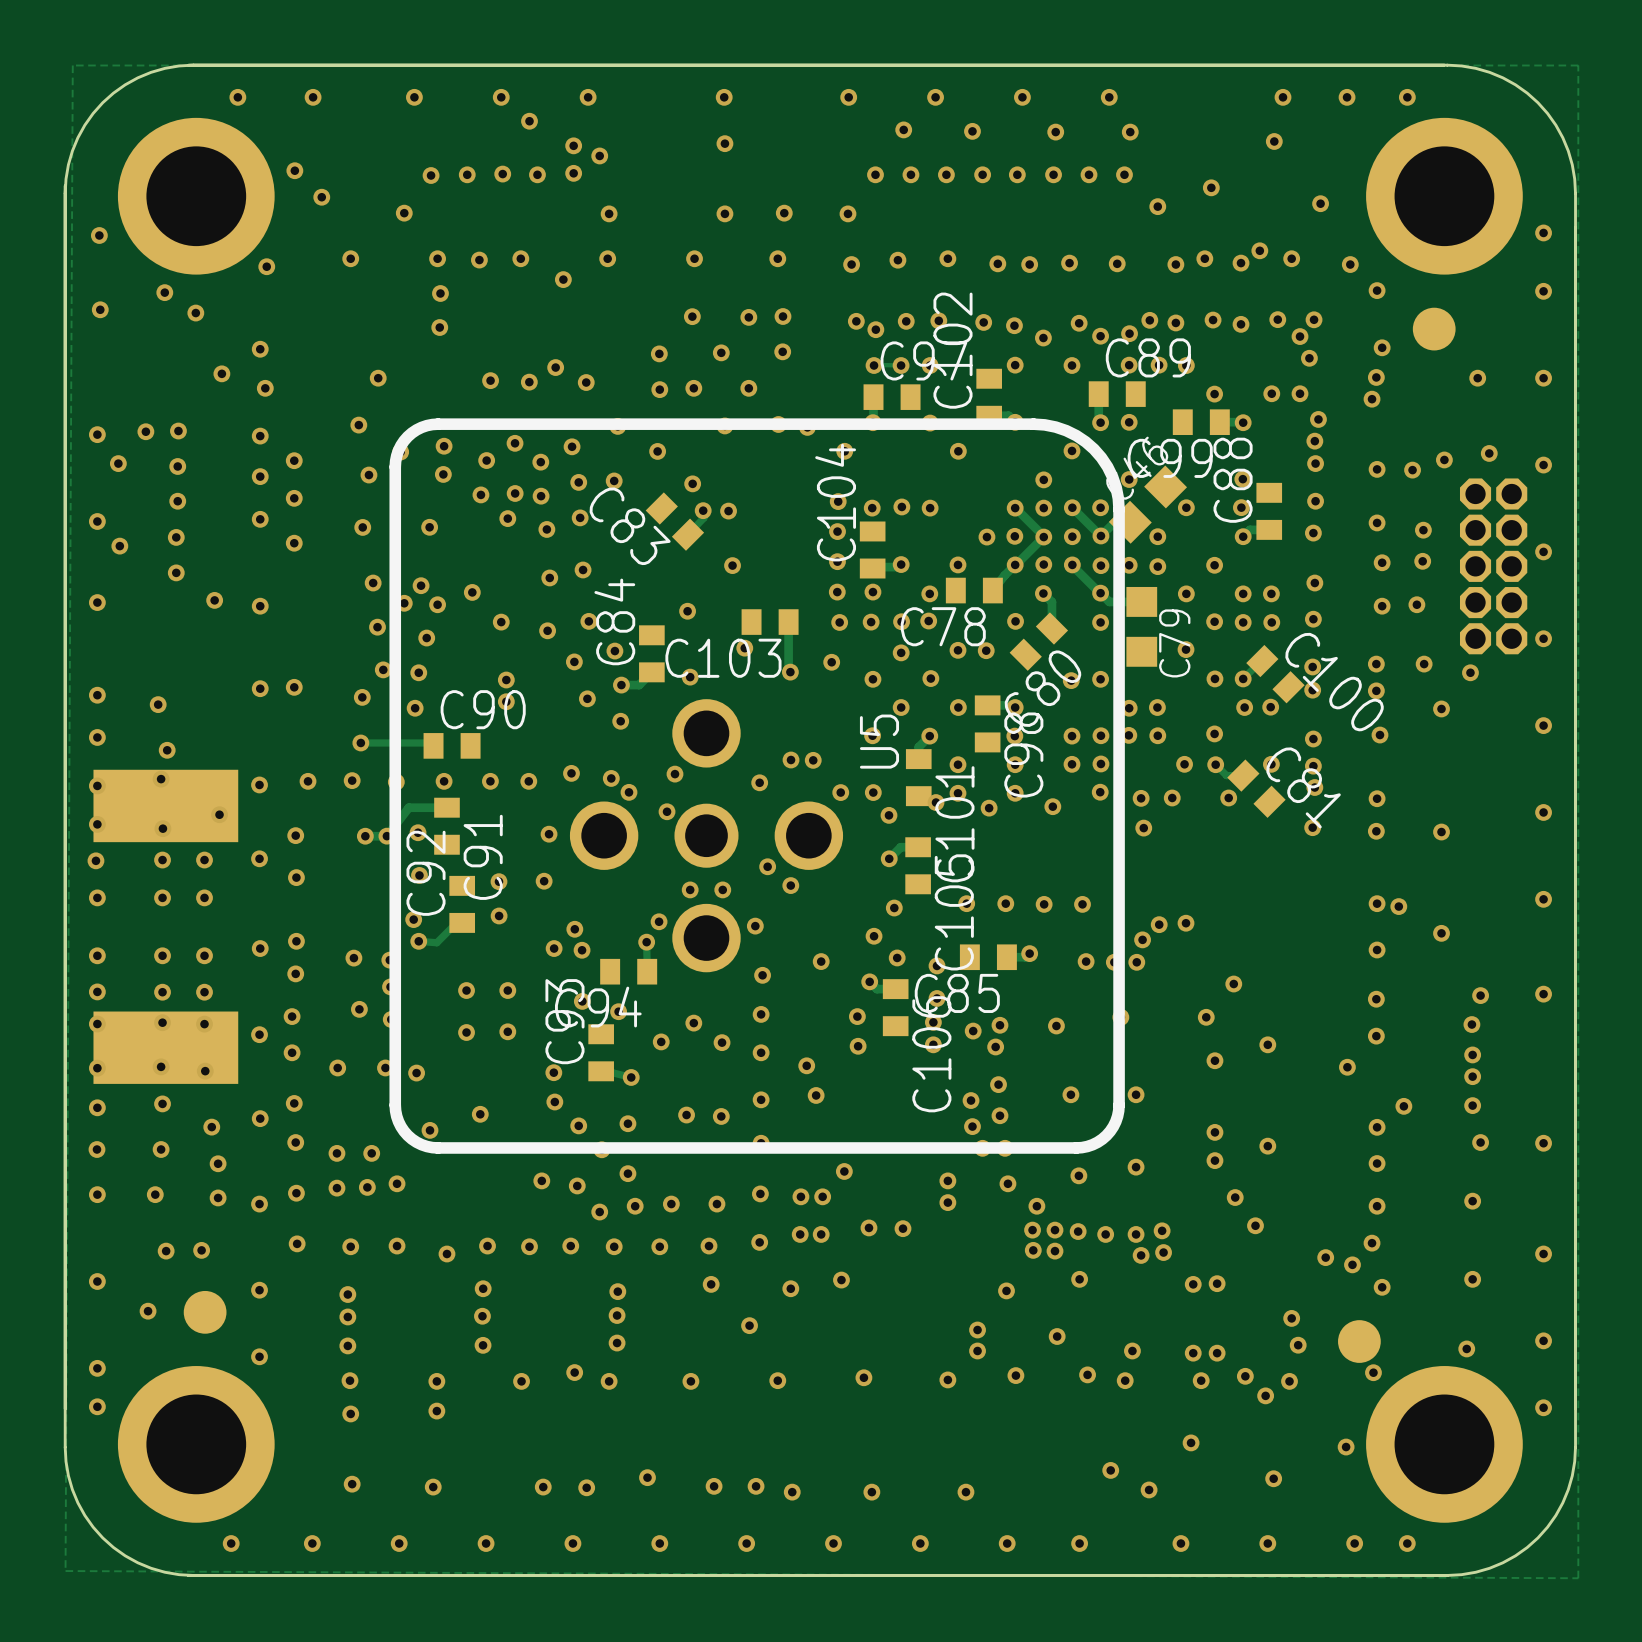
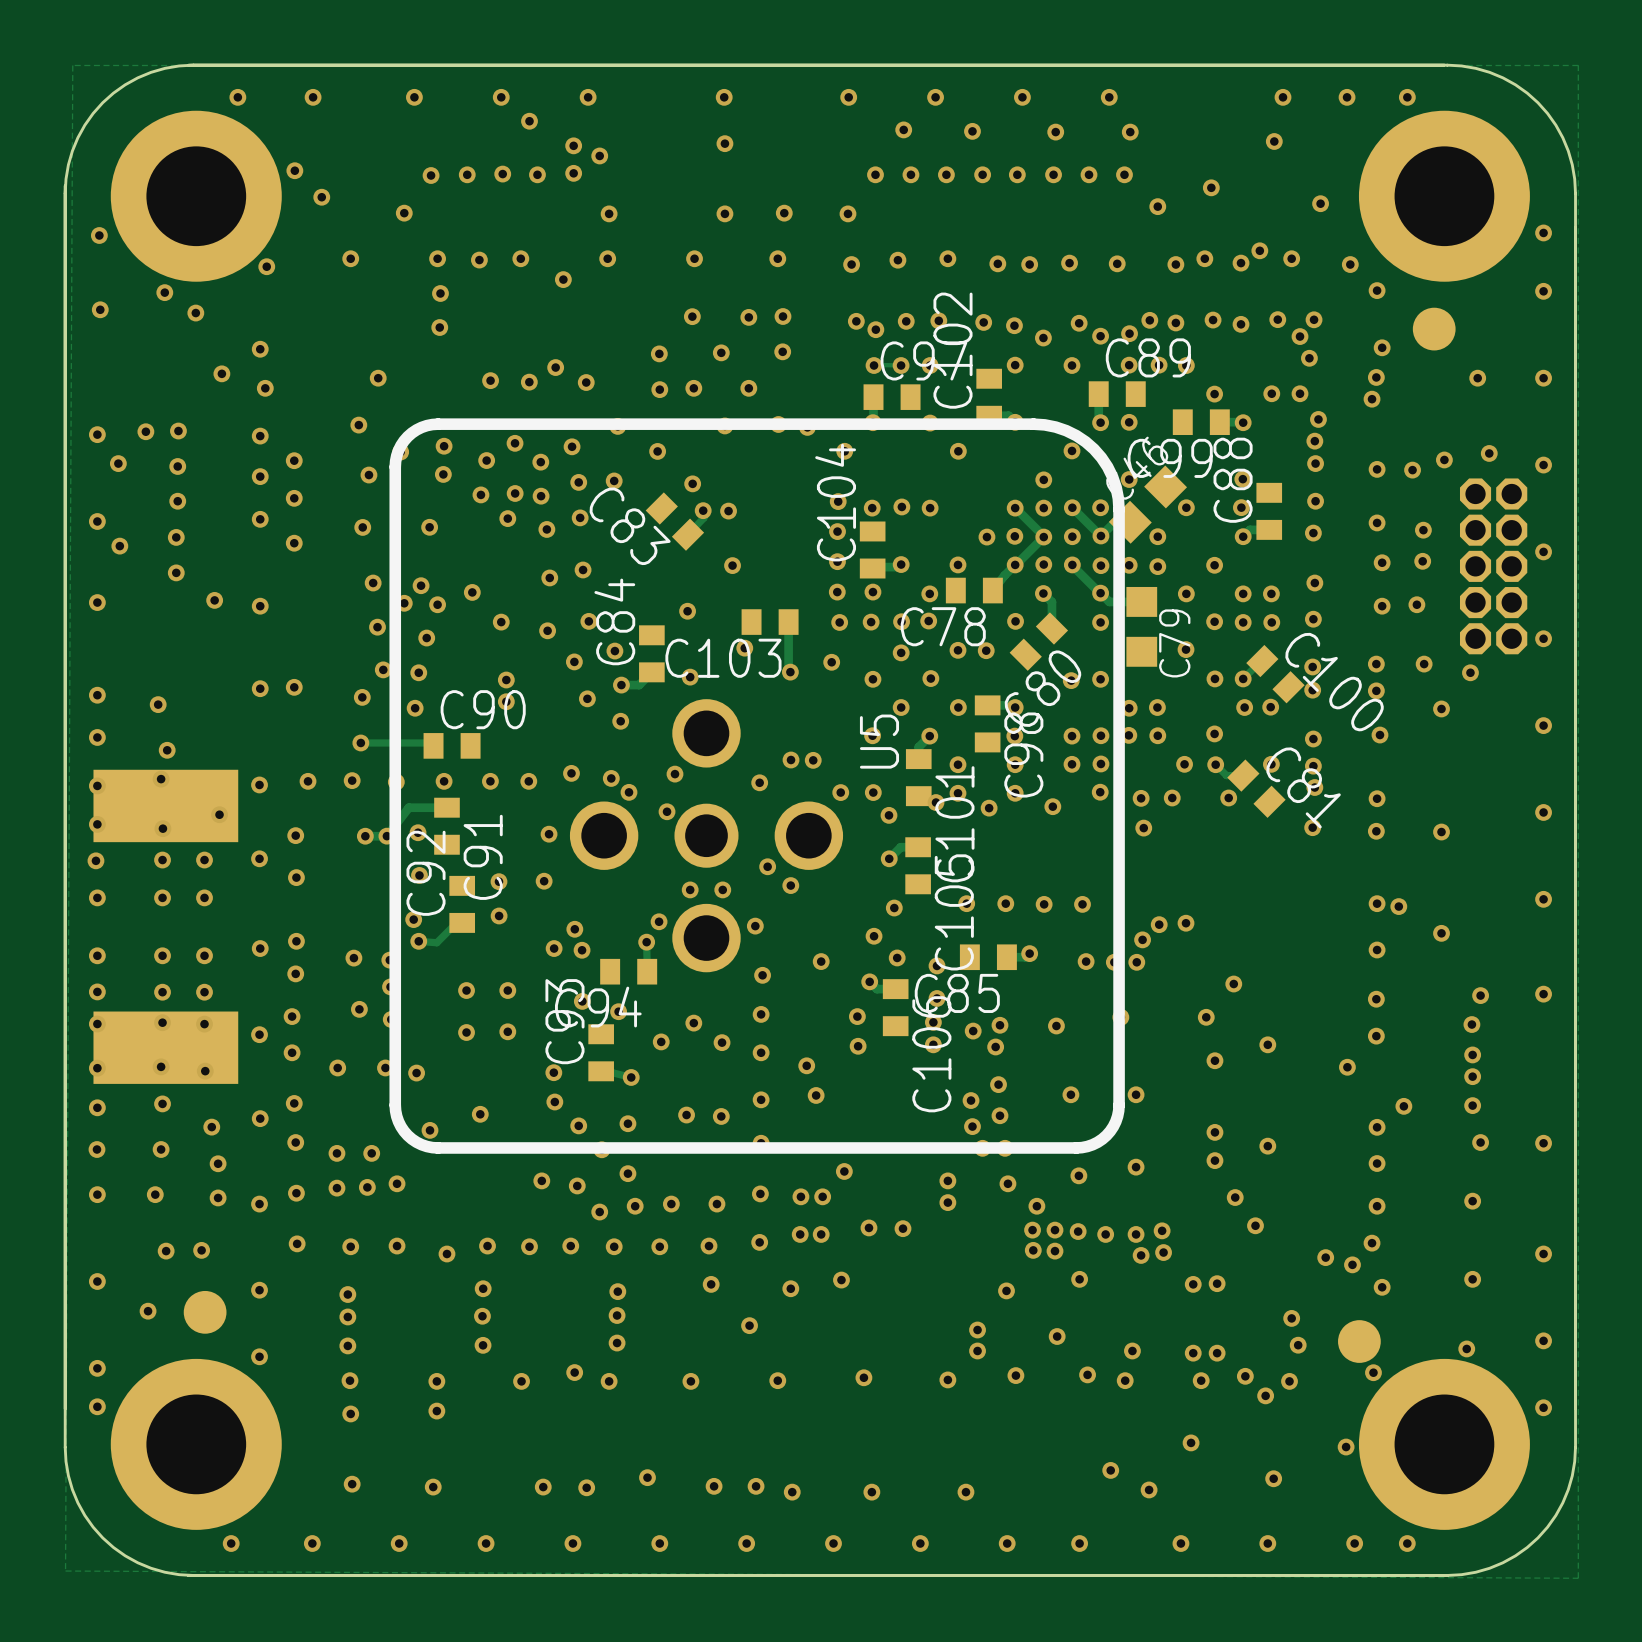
part footprint: [117, 117, 275, 275] -> [110, 110, 282, 282]
part footprint: [1366, 117, 1523, 275] -> [1358, 110, 1530, 282]
part footprint: [117, 1366, 275, 1523] -> [110, 1358, 282, 1530]
part footprint: [1366, 1366, 1523, 1523] -> [1358, 1358, 1530, 1530]

